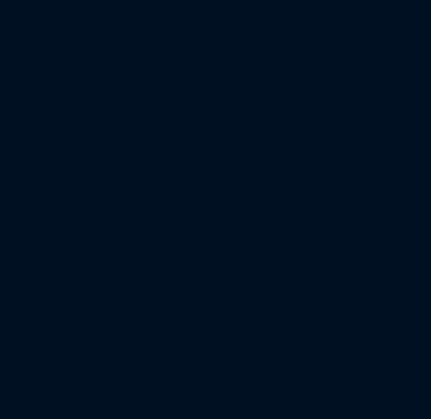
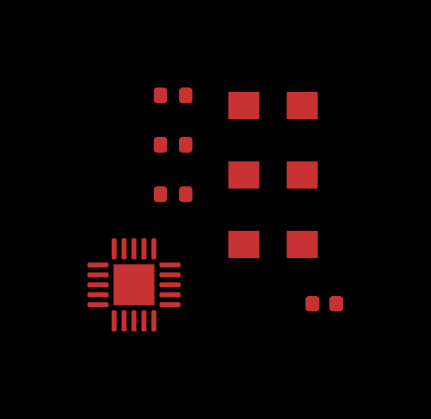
part: none -> (173, 95)
part: none -> (273, 105)
part: none -> (173, 144)
part: none -> (273, 174)
part: none -> (173, 194)
part: none -> (273, 244)
part: none -> (133, 284)
part: none -> (324, 303)

